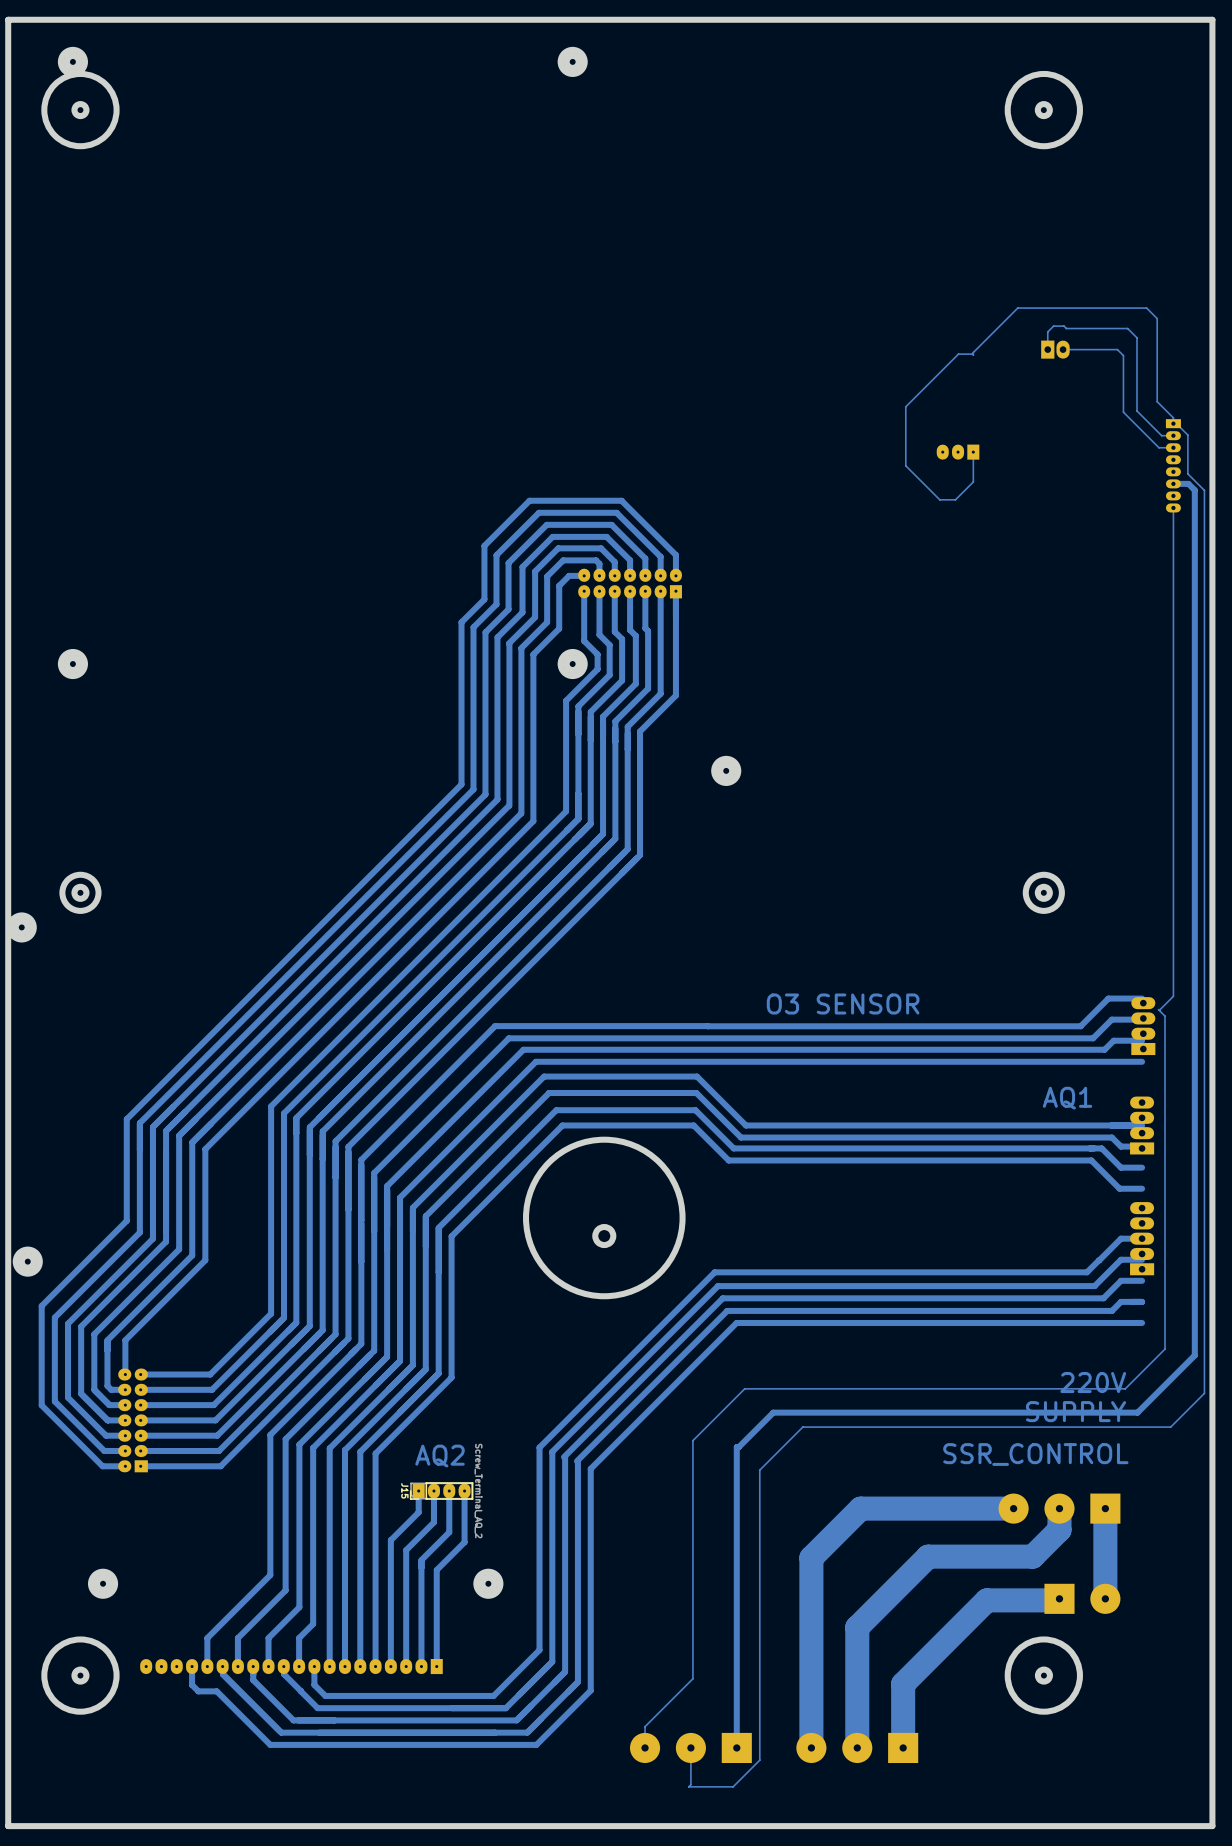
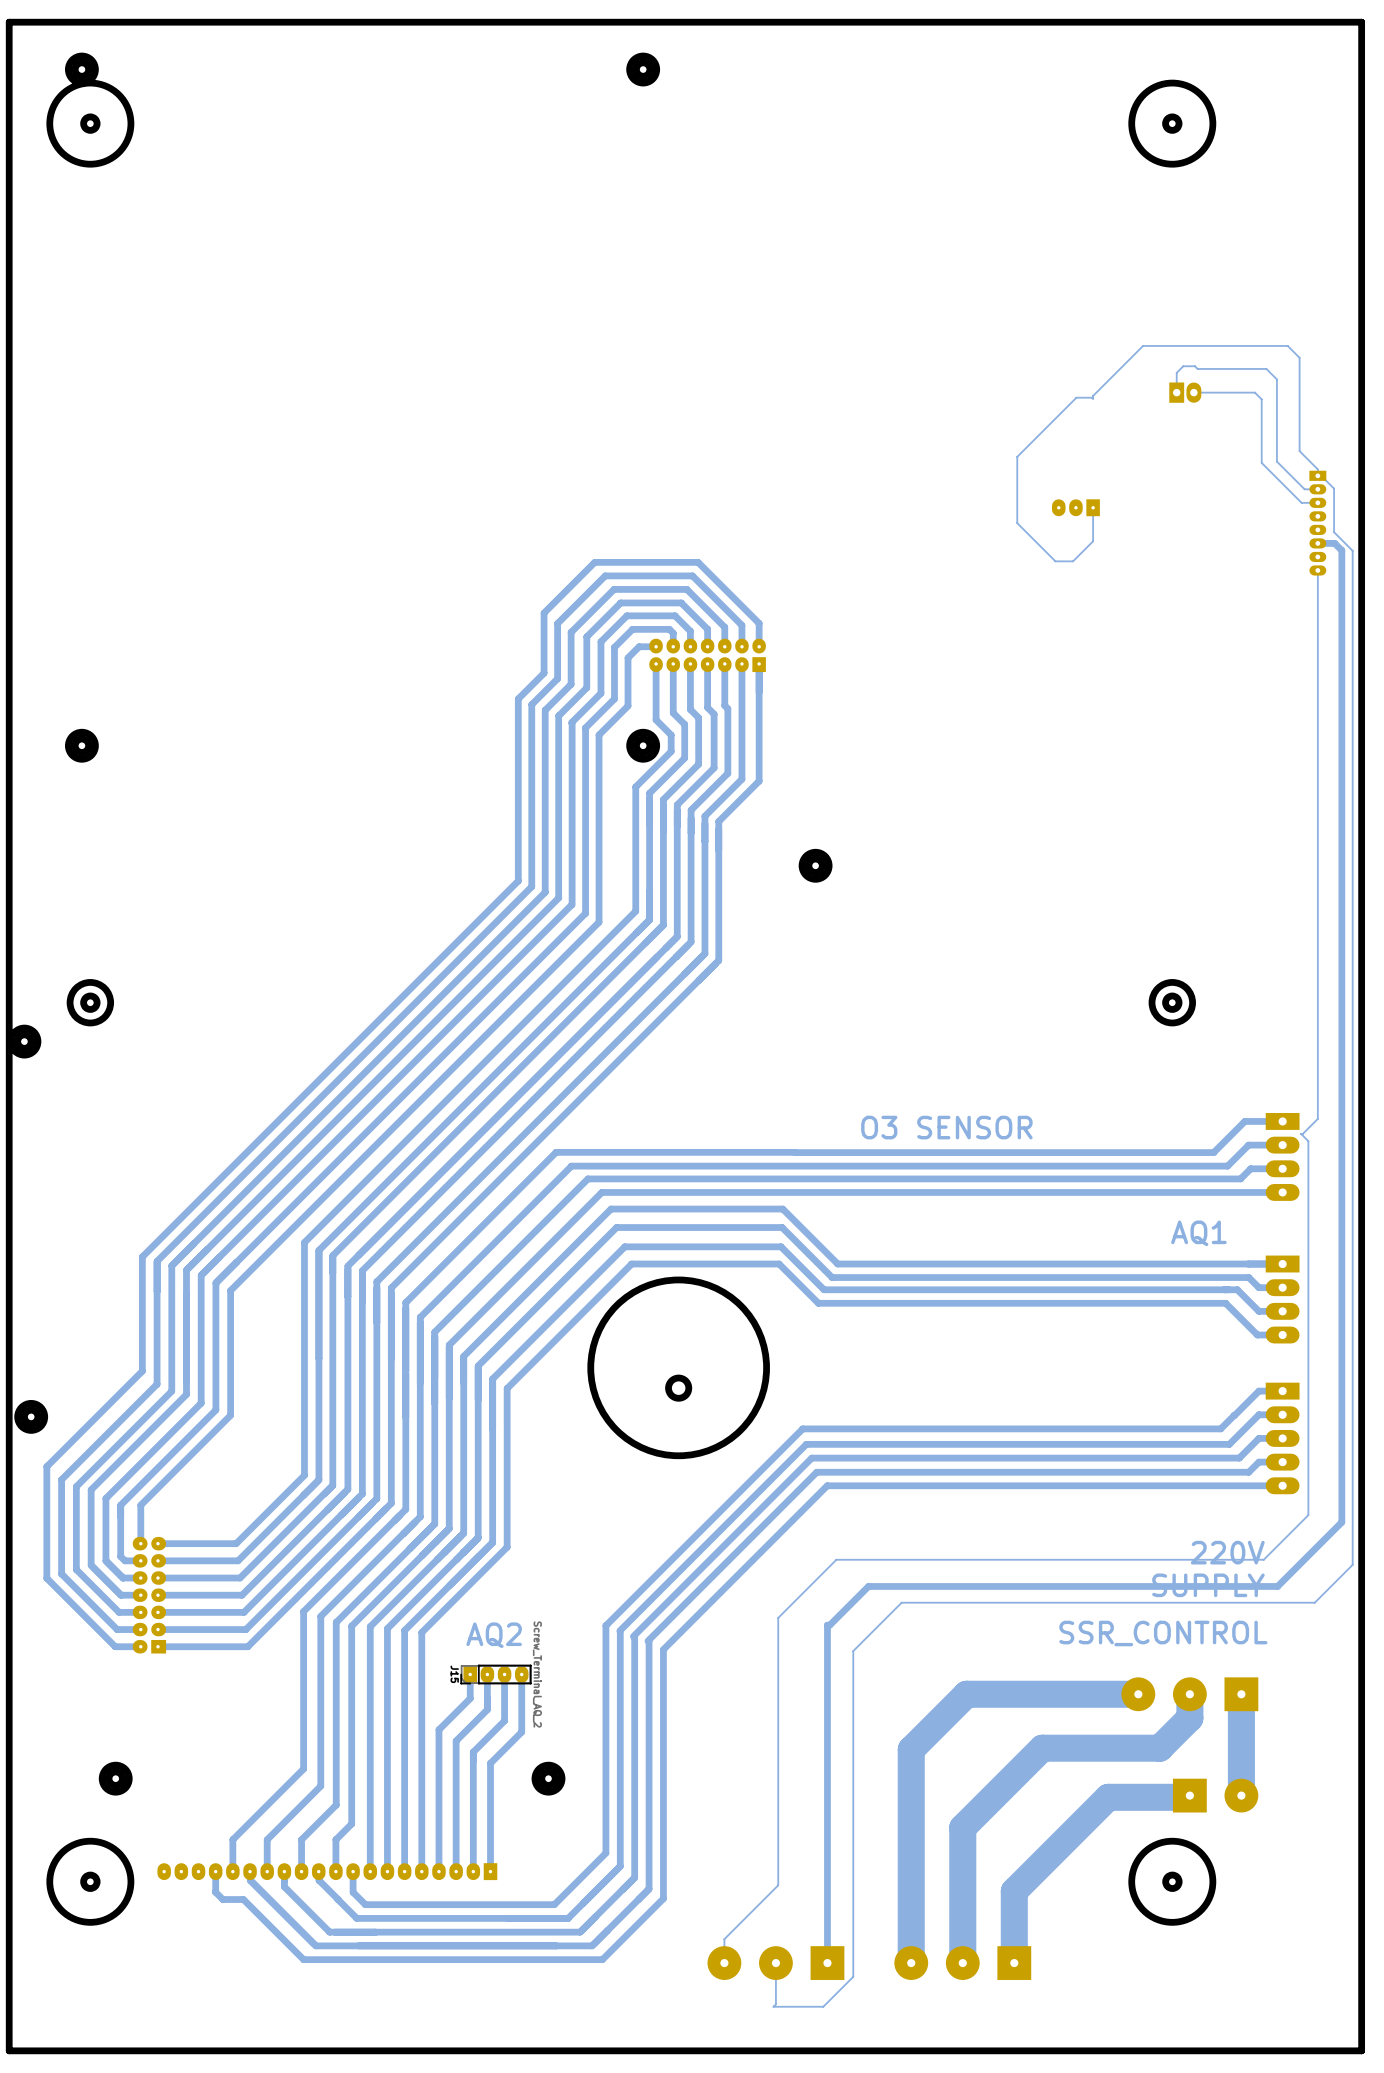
part footprint: [1131, 997, 1156, 1056] -> [1265, 1113, 1300, 1201]
part: (1142, 1125) -> none
part: none -> (1282, 1299)
part: (1142, 1238) -> none
part: none -> (1282, 1438)

